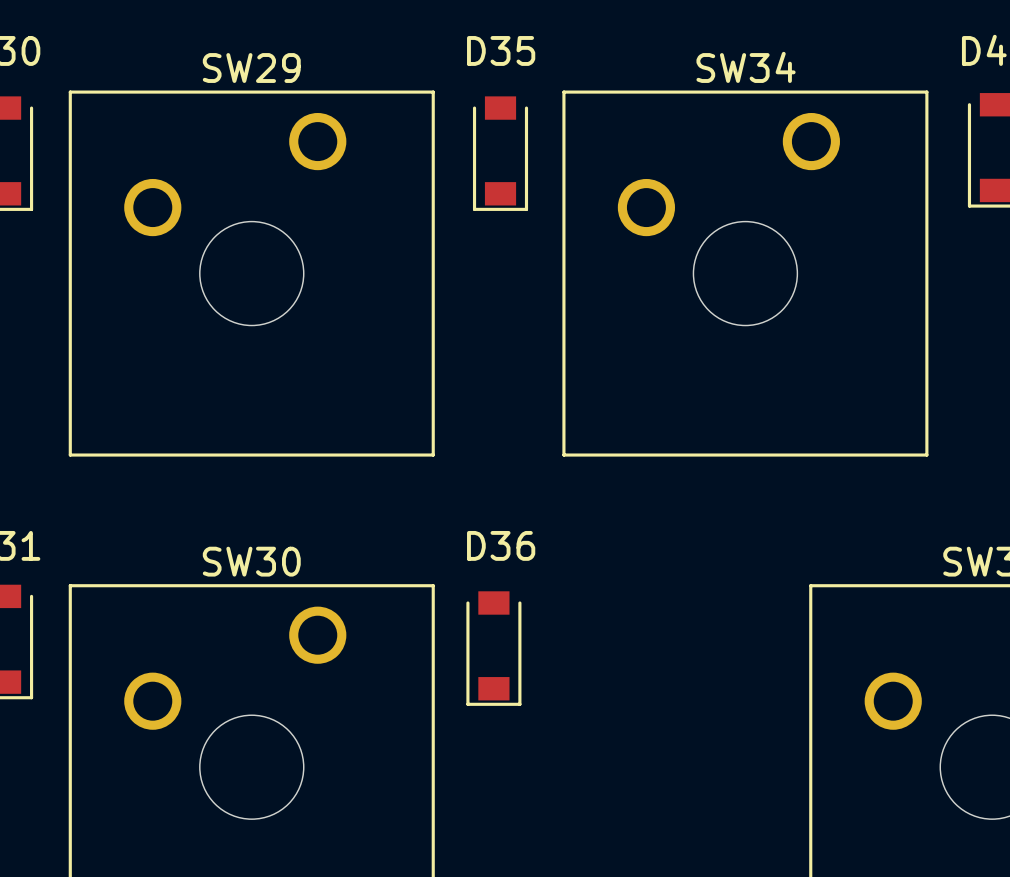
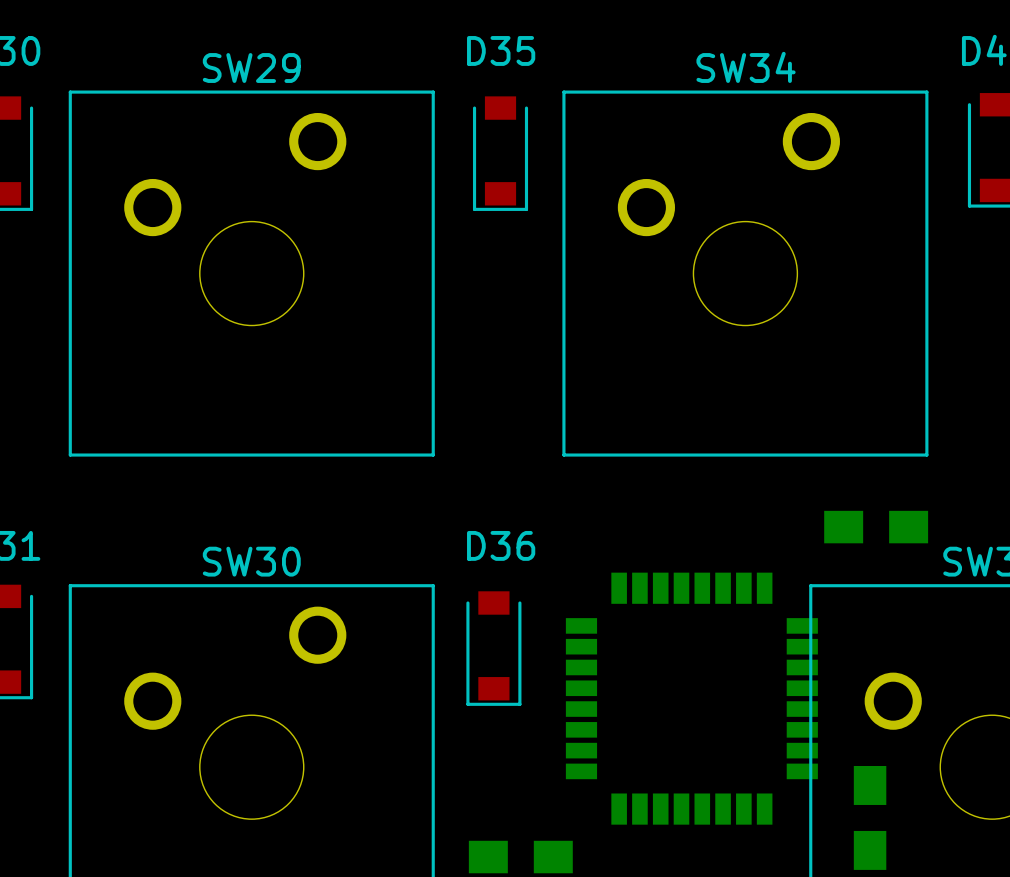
part: none -> (876, 527)
part: none -> (691, 698)
part: none -> (870, 817)
part: none -> (520, 857)

